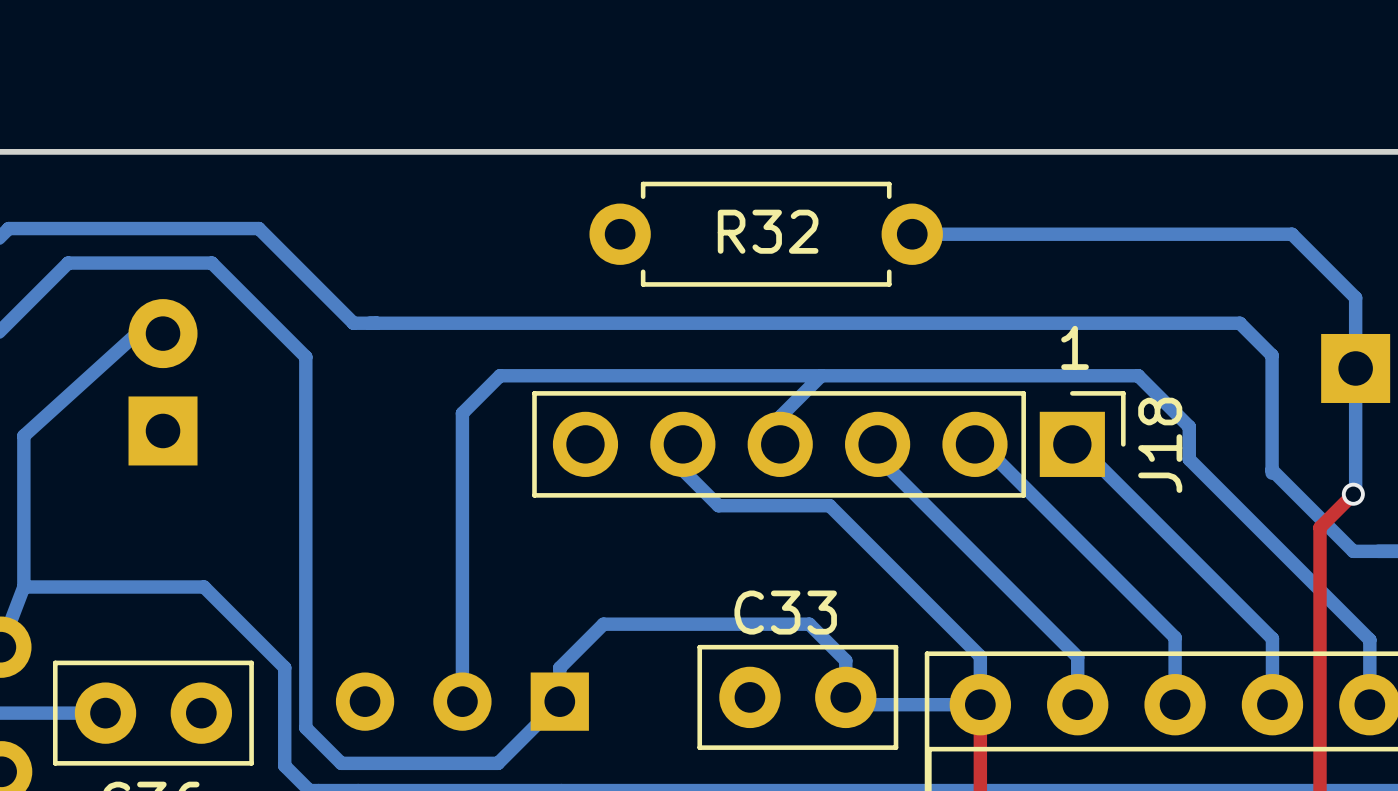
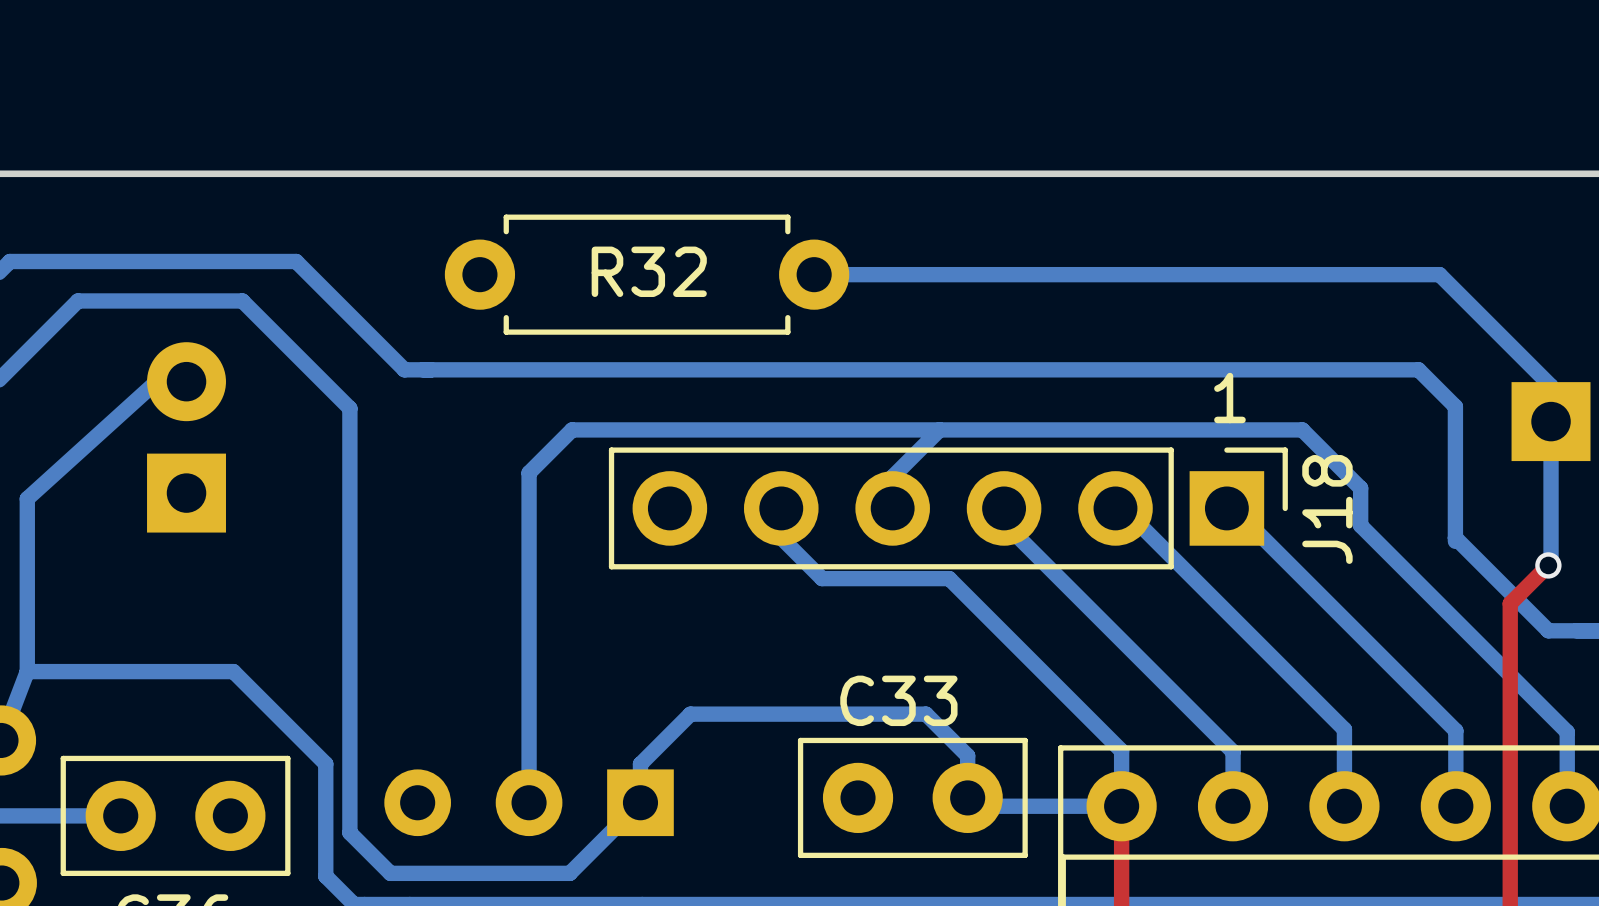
R32 position: (766, 234) -> (647, 274)
bottom track: (912, 234) (1292, 234) (1355, 297) (1355, 337) -> (814, 274) (1439, 274) (1551, 386)

